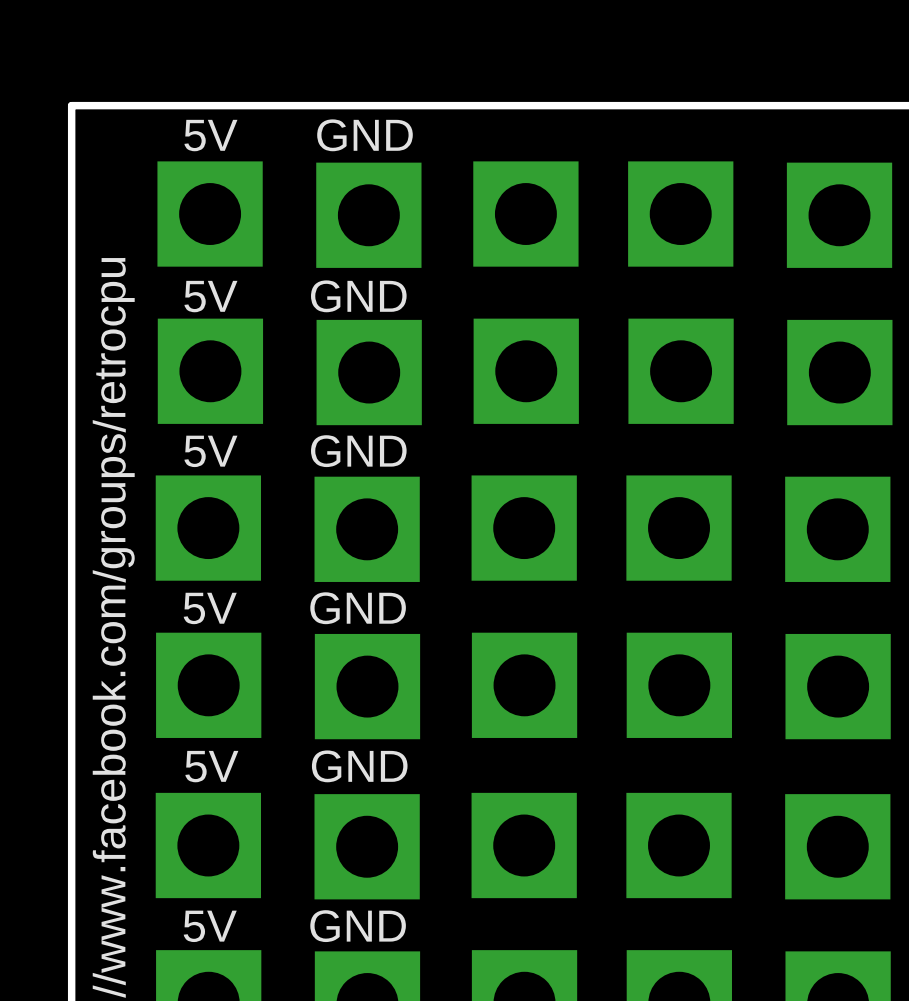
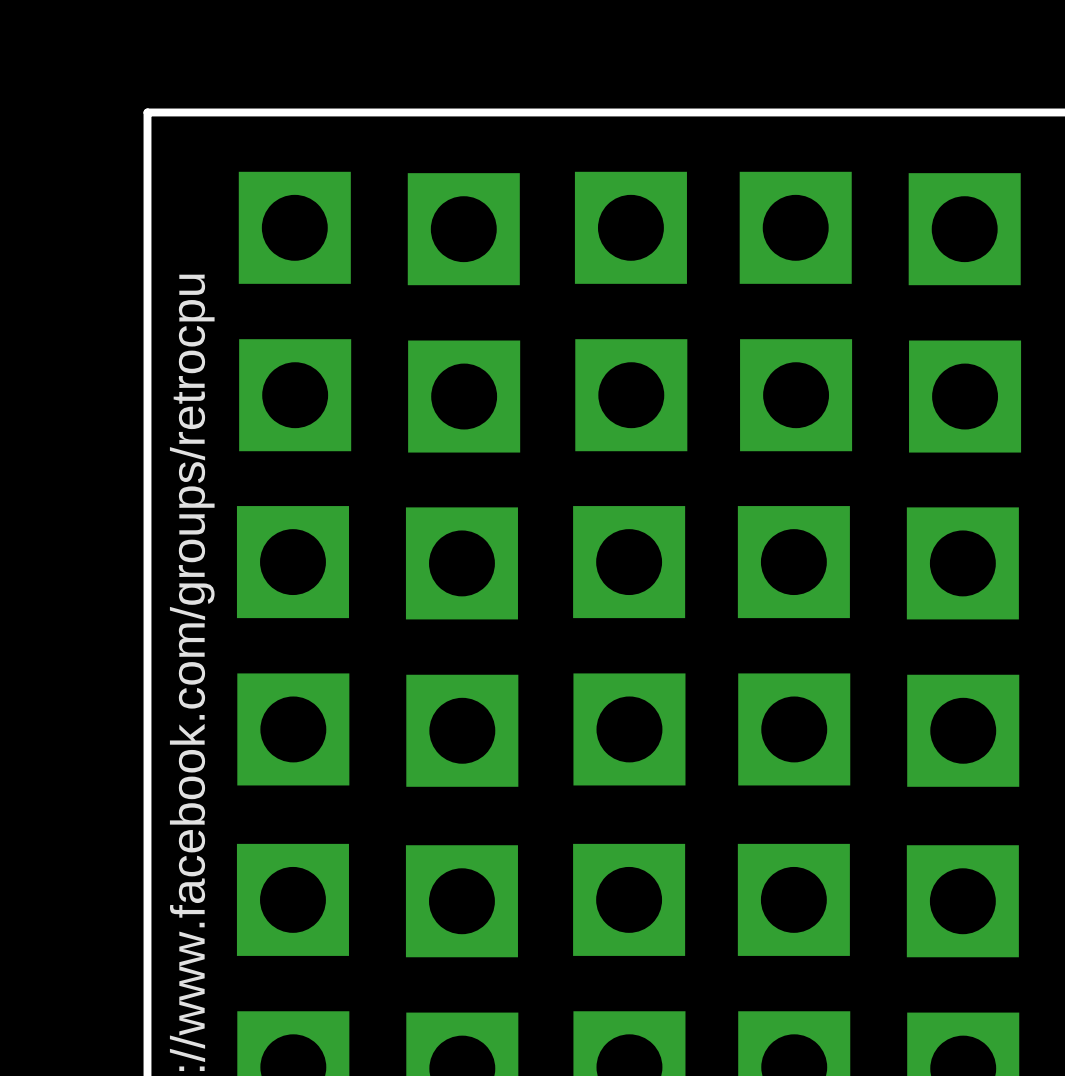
text: 5V (210, 135) -> none
text: GND (364, 135) -> none
text: 5V (210, 296) -> none
text: GND (358, 296) -> none
text: 5V (210, 451) -> none
text: GND (358, 451) -> none
text: 5V (210, 608) -> none
text: GND (358, 608) -> none
text: 5V (211, 766) -> none
text: GND (359, 766) -> none
text: 5V (210, 926) -> none
text: GND (358, 926) -> none

